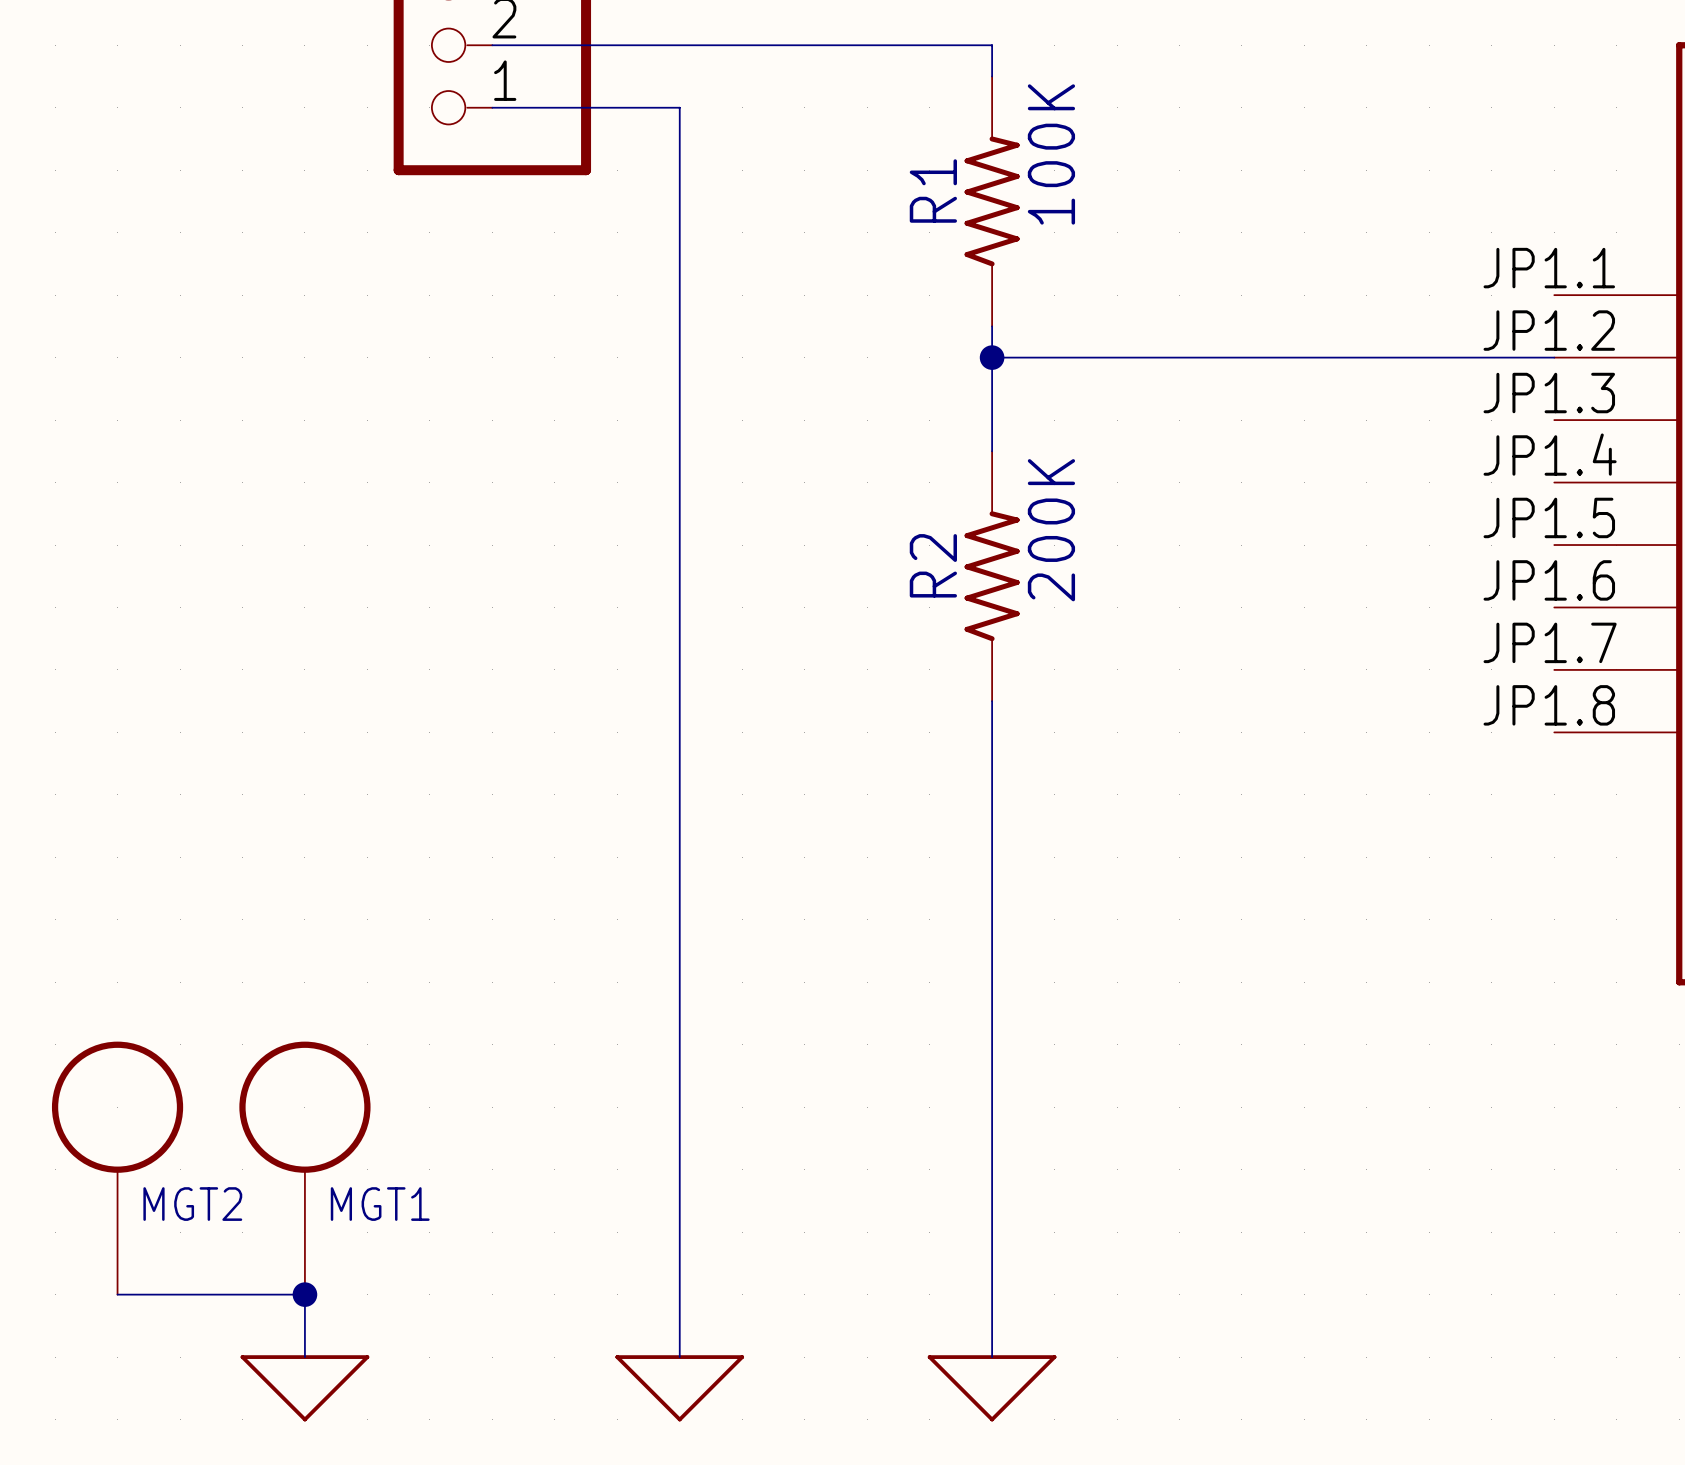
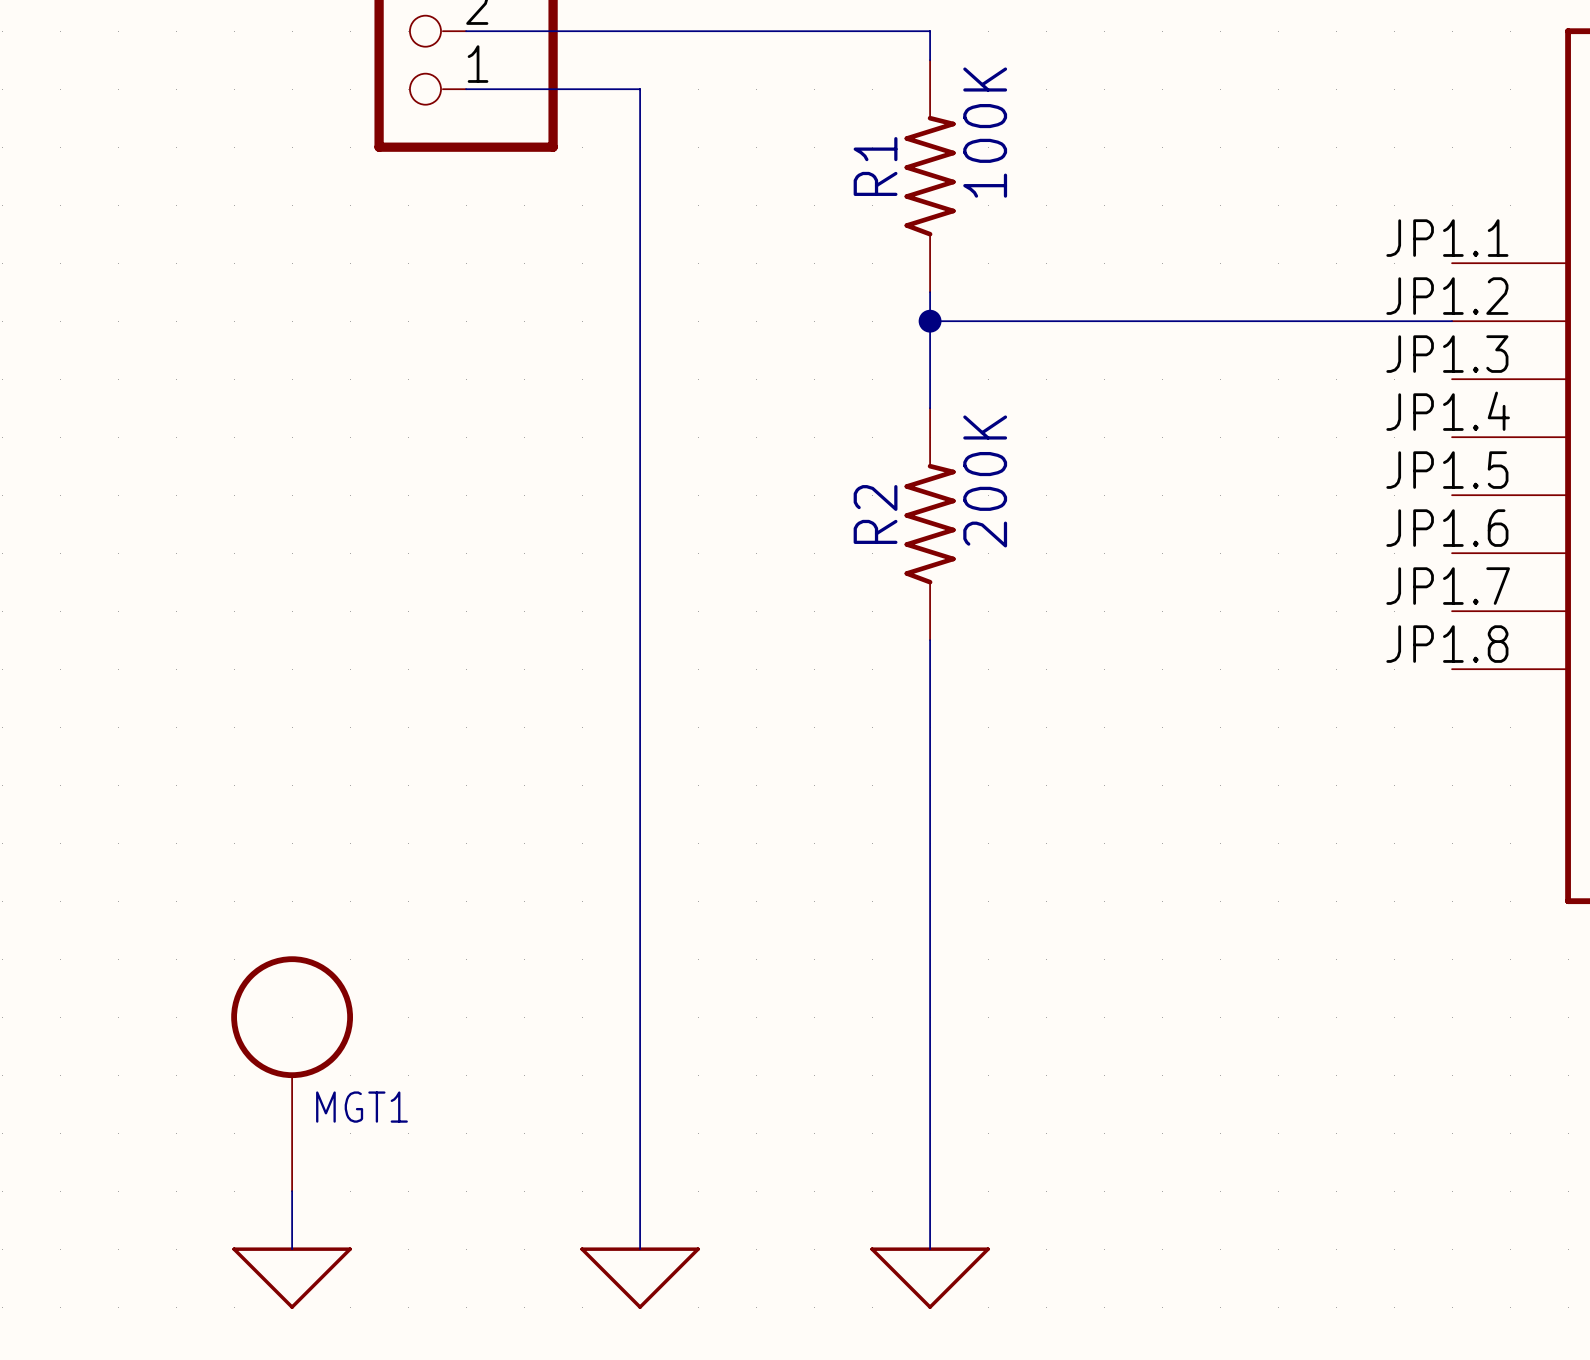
MGT2: (117, 1168) -> none
wire: (117, 1294) (304, 1294) -> none
junction: (304, 1294) -> none

